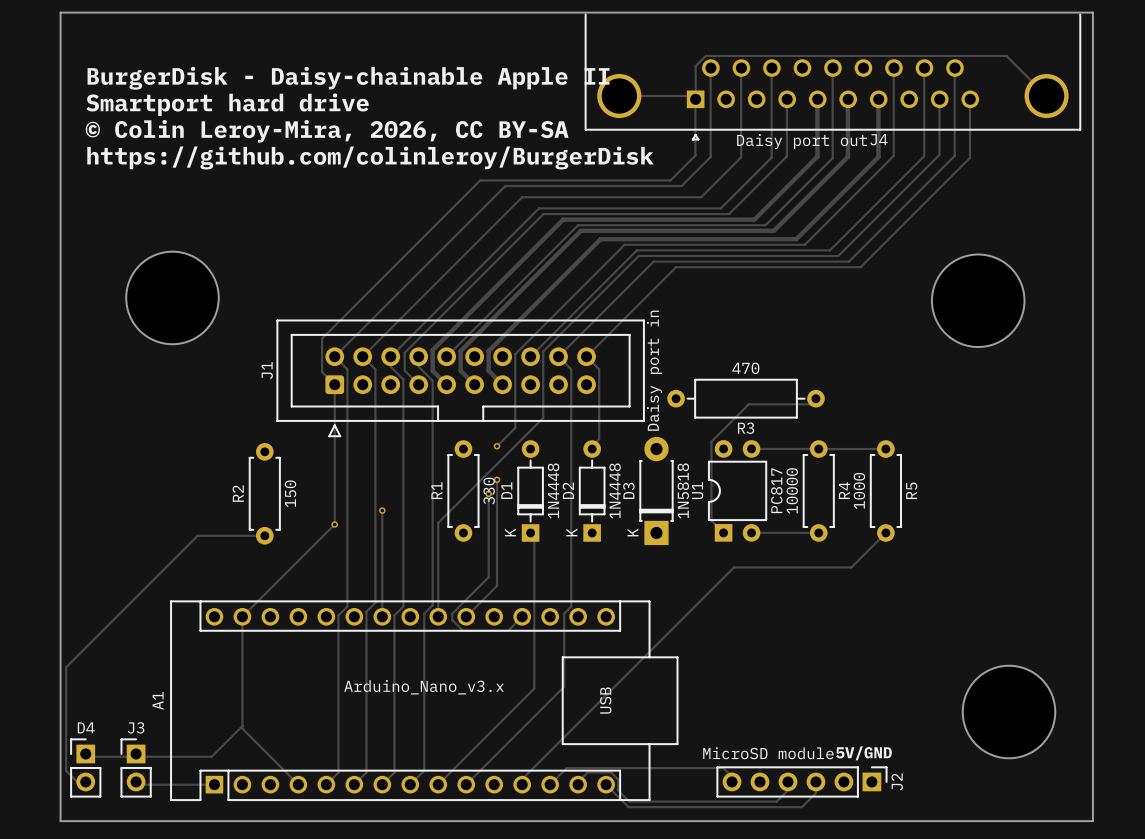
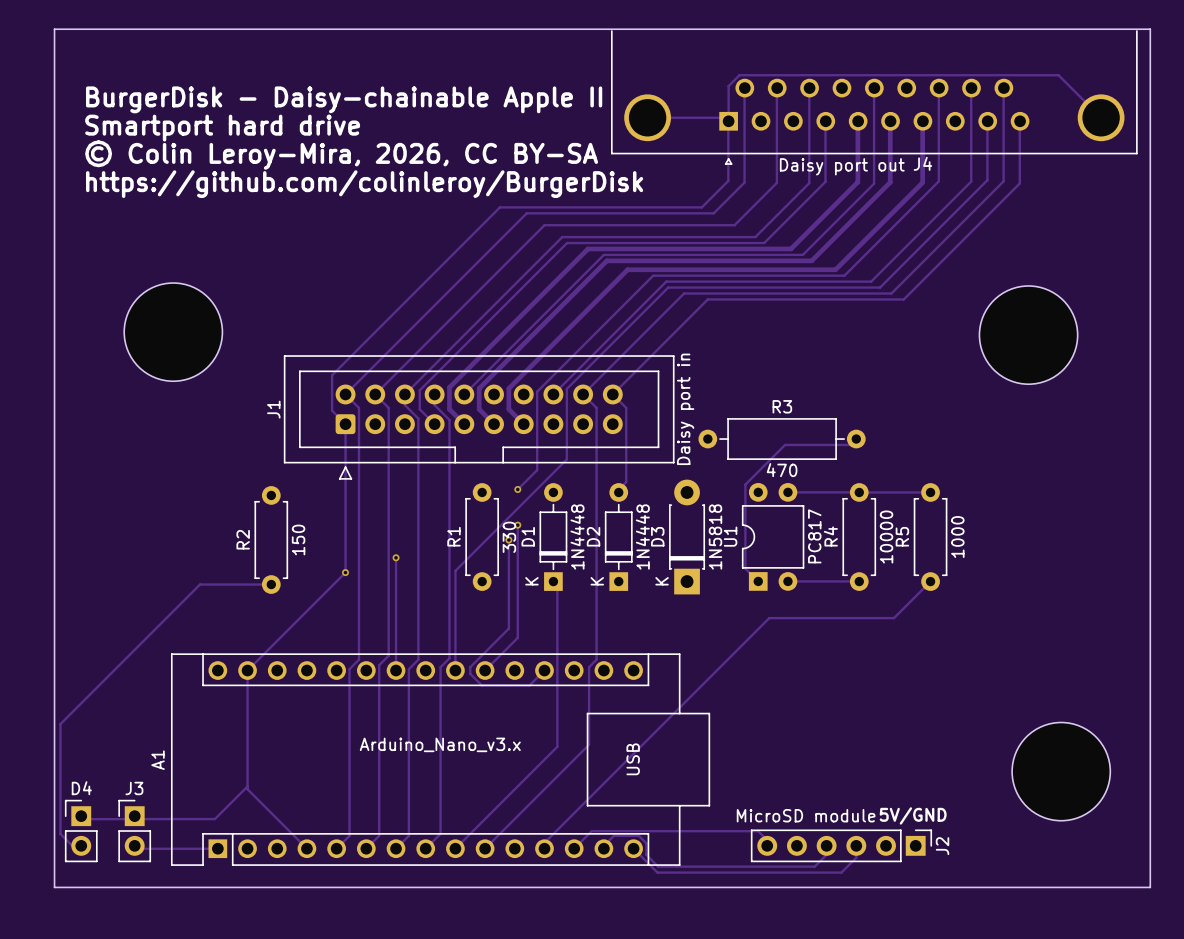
R3 value position: 470 (745, 368) -> 470 (782, 470)
R3 name position: R3 (746, 428) -> R3 (782, 406)
R4 name position: R4 (844, 490) -> R4 (830, 536)
R5 name position: R5 (911, 490) -> R5 (902, 536)
R4 value position: 10000 (792, 491) -> 10000 (886, 537)
R5 value position: 1000 (859, 491) -> 1000 (957, 537)

